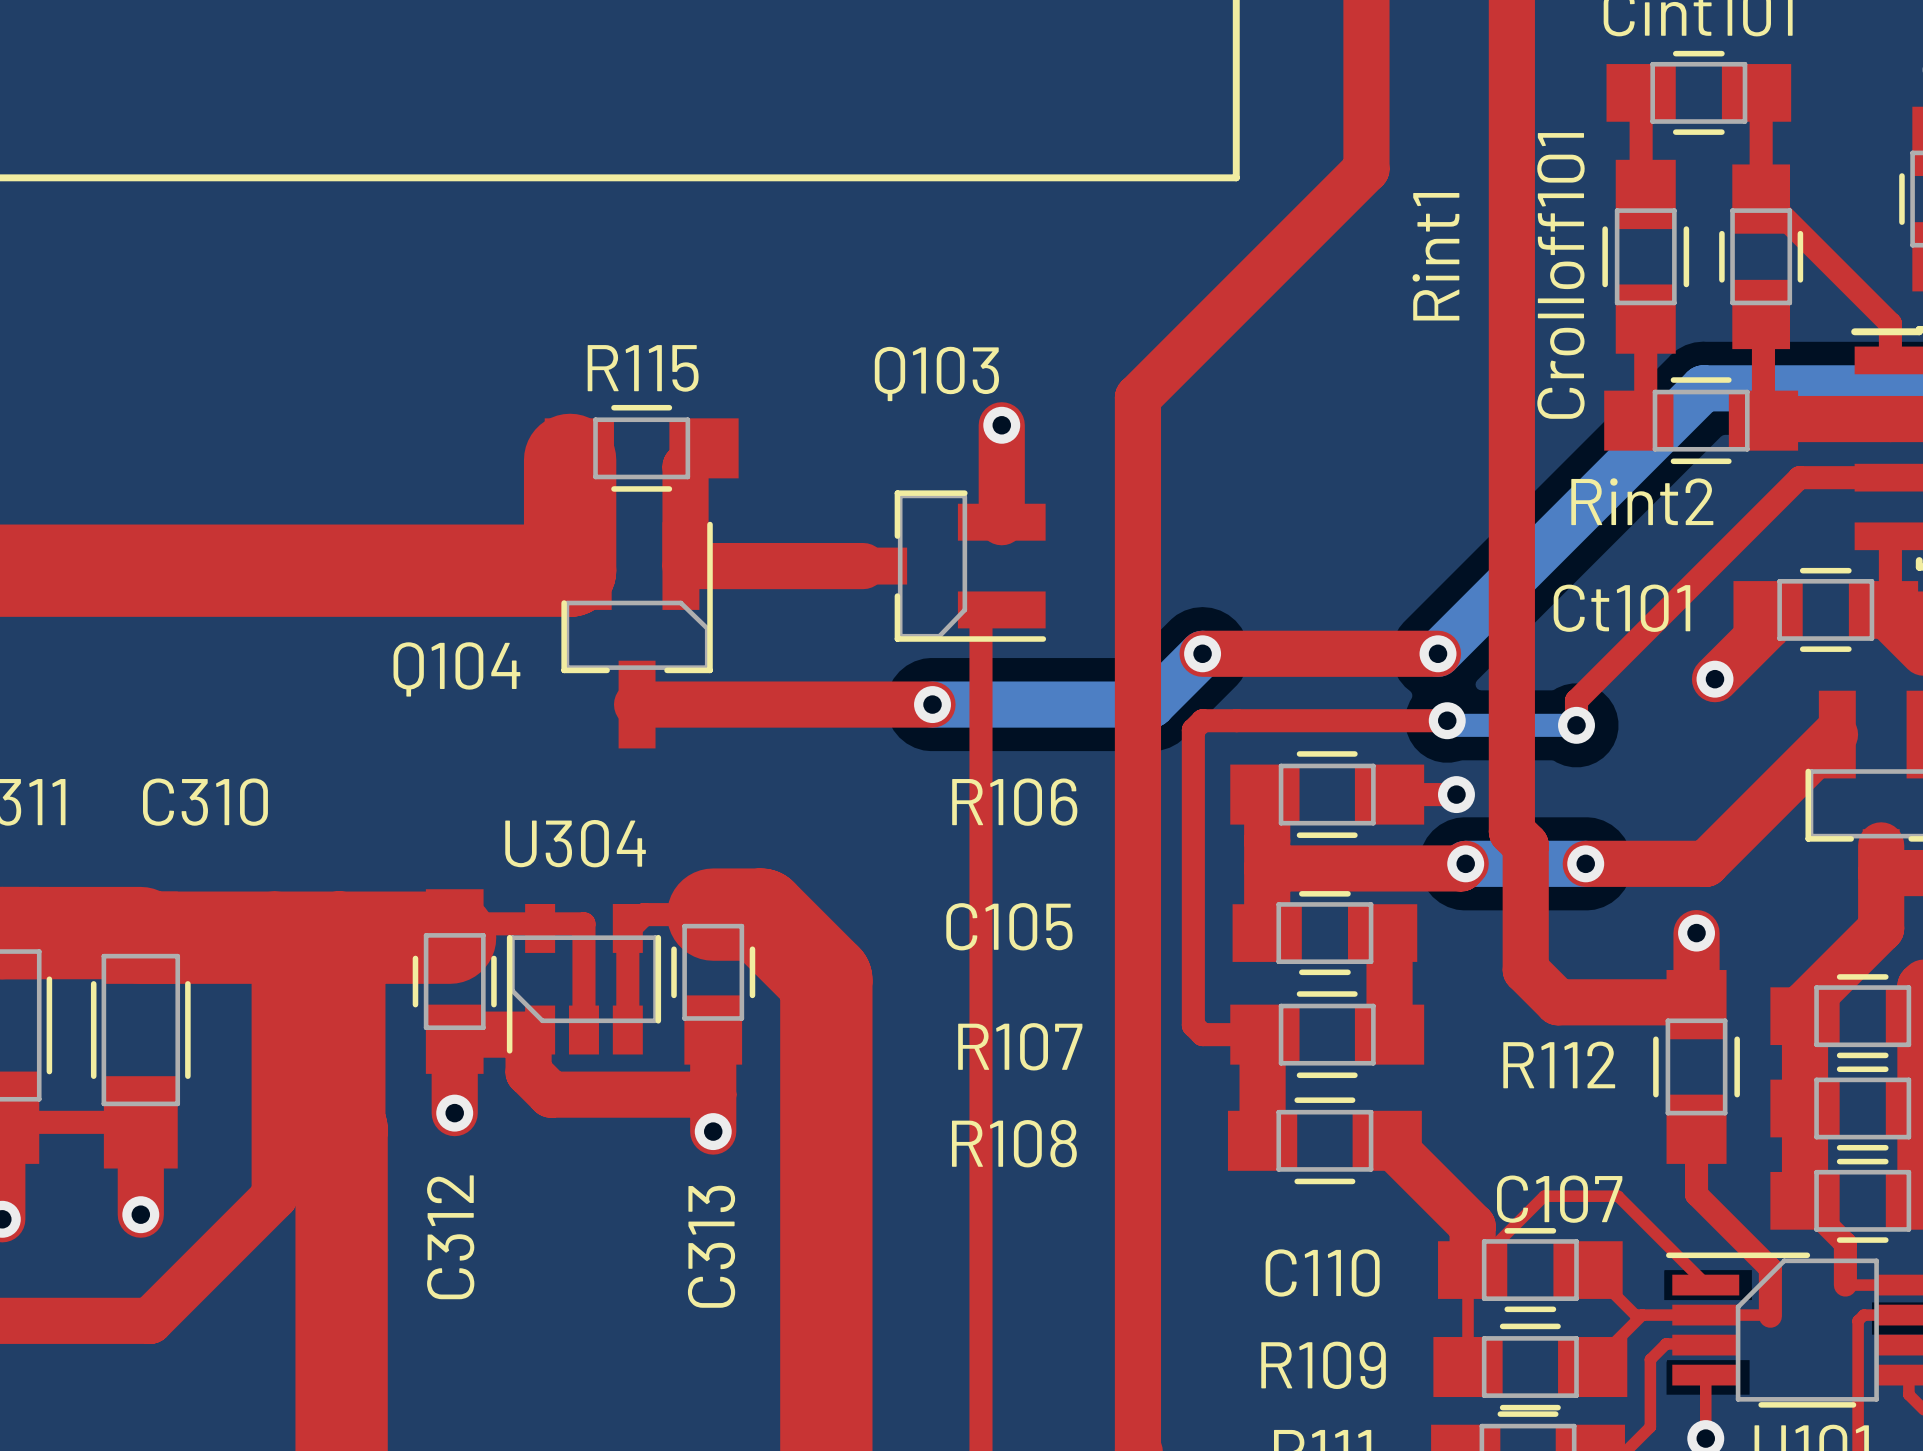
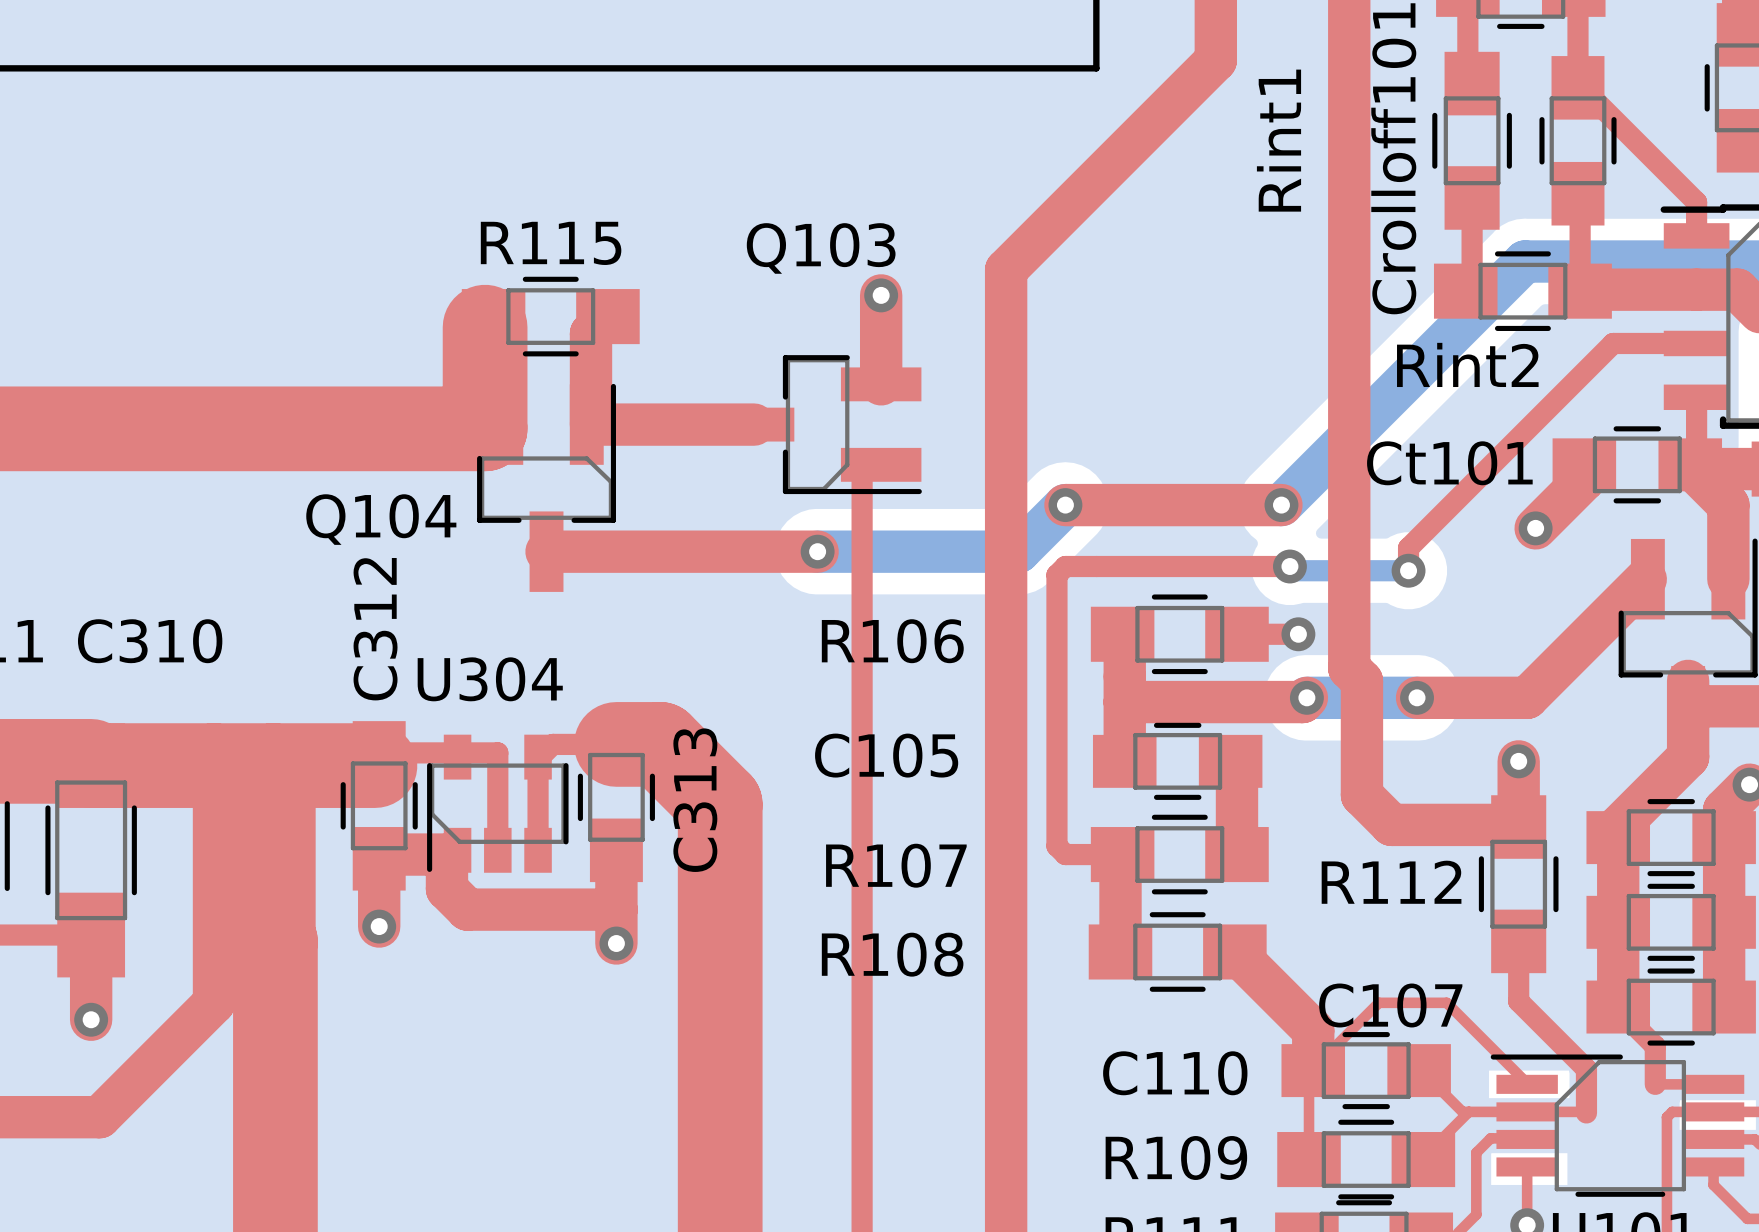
C312 name position: C312 (450, 1237) -> C312 (375, 629)
C313 name position: C313 (711, 1246) -> C313 (695, 800)

